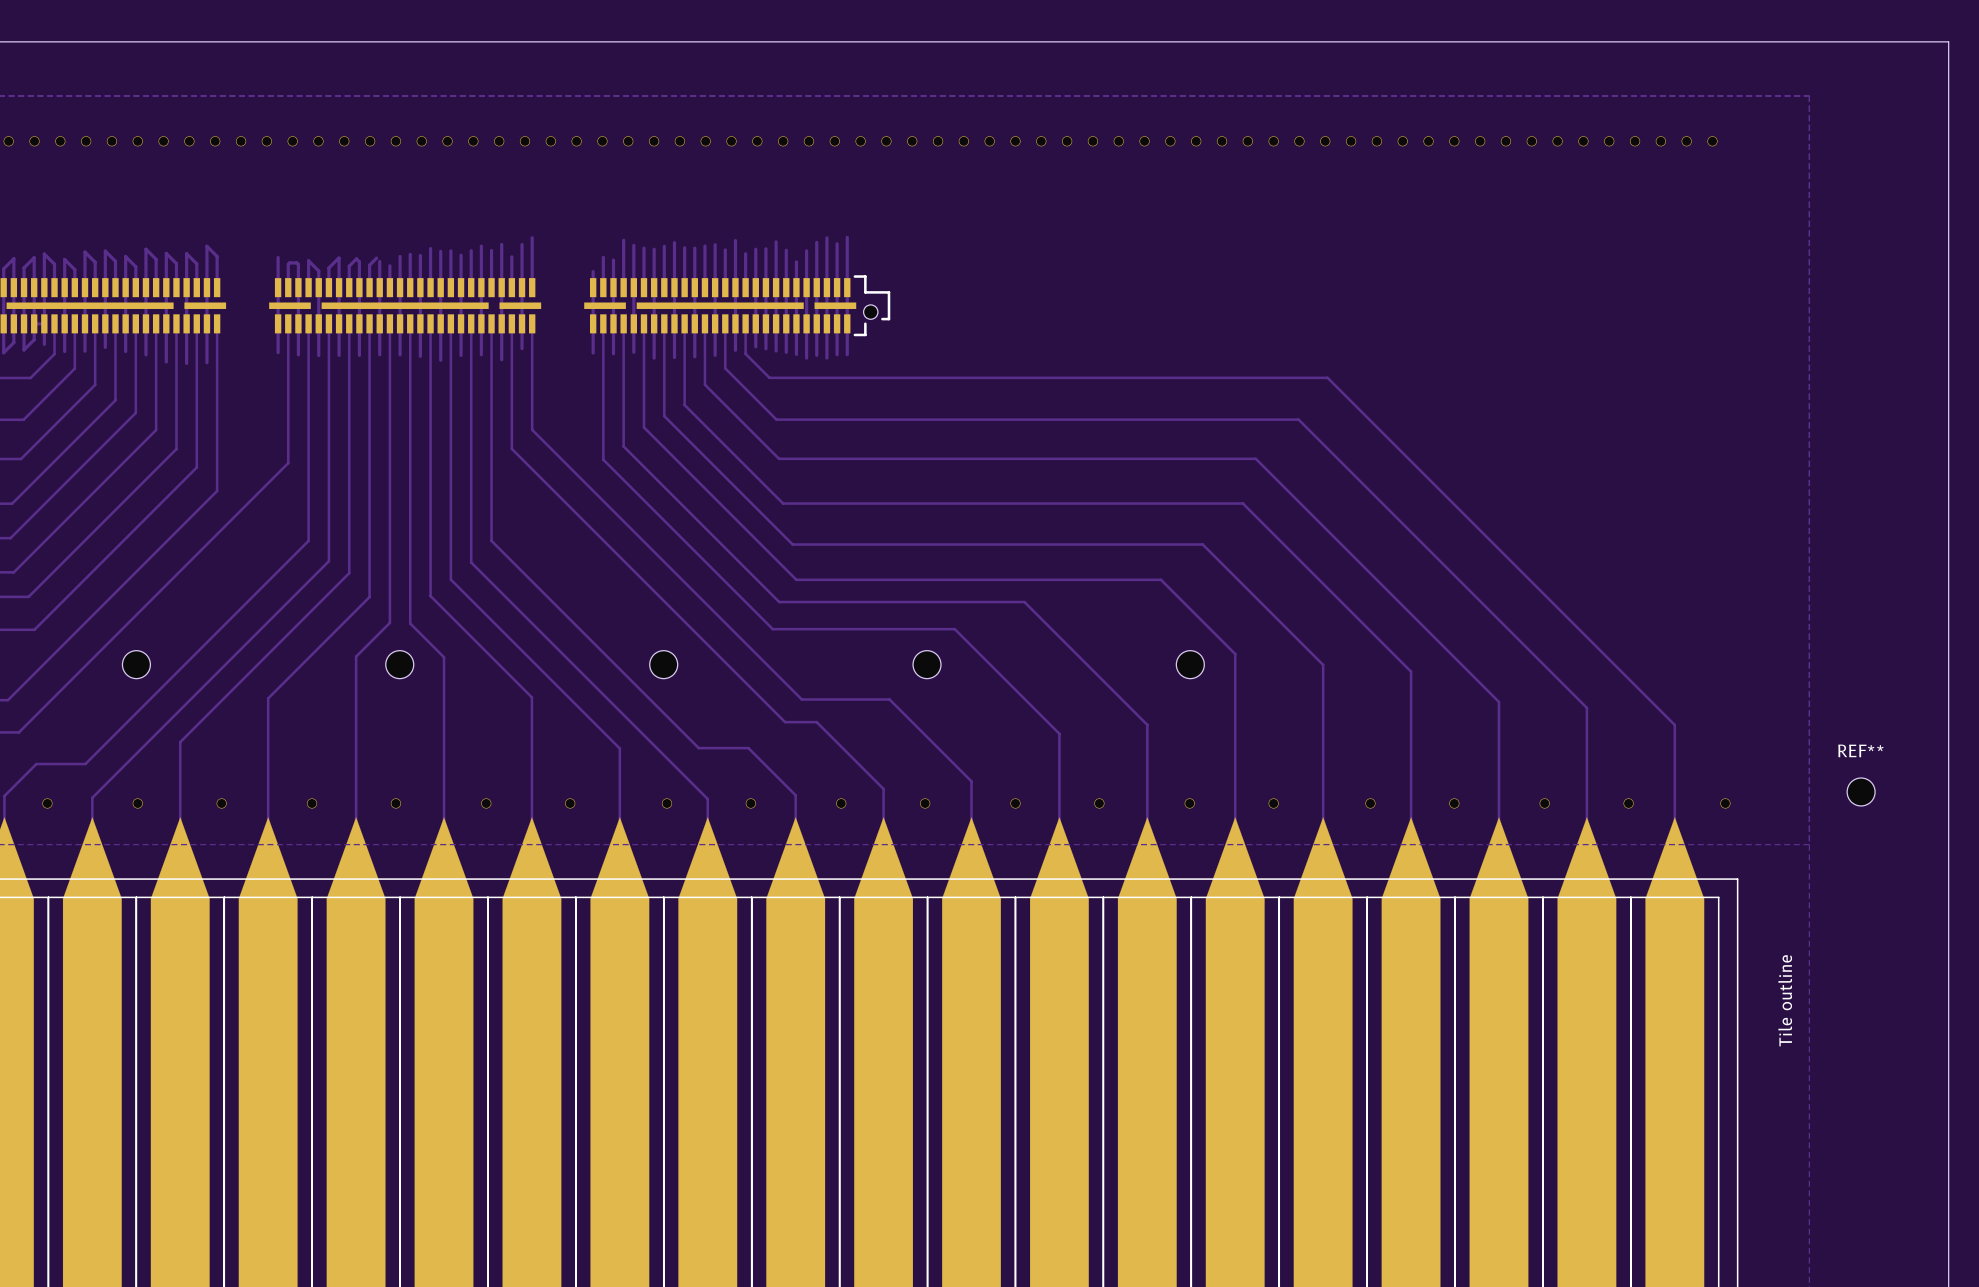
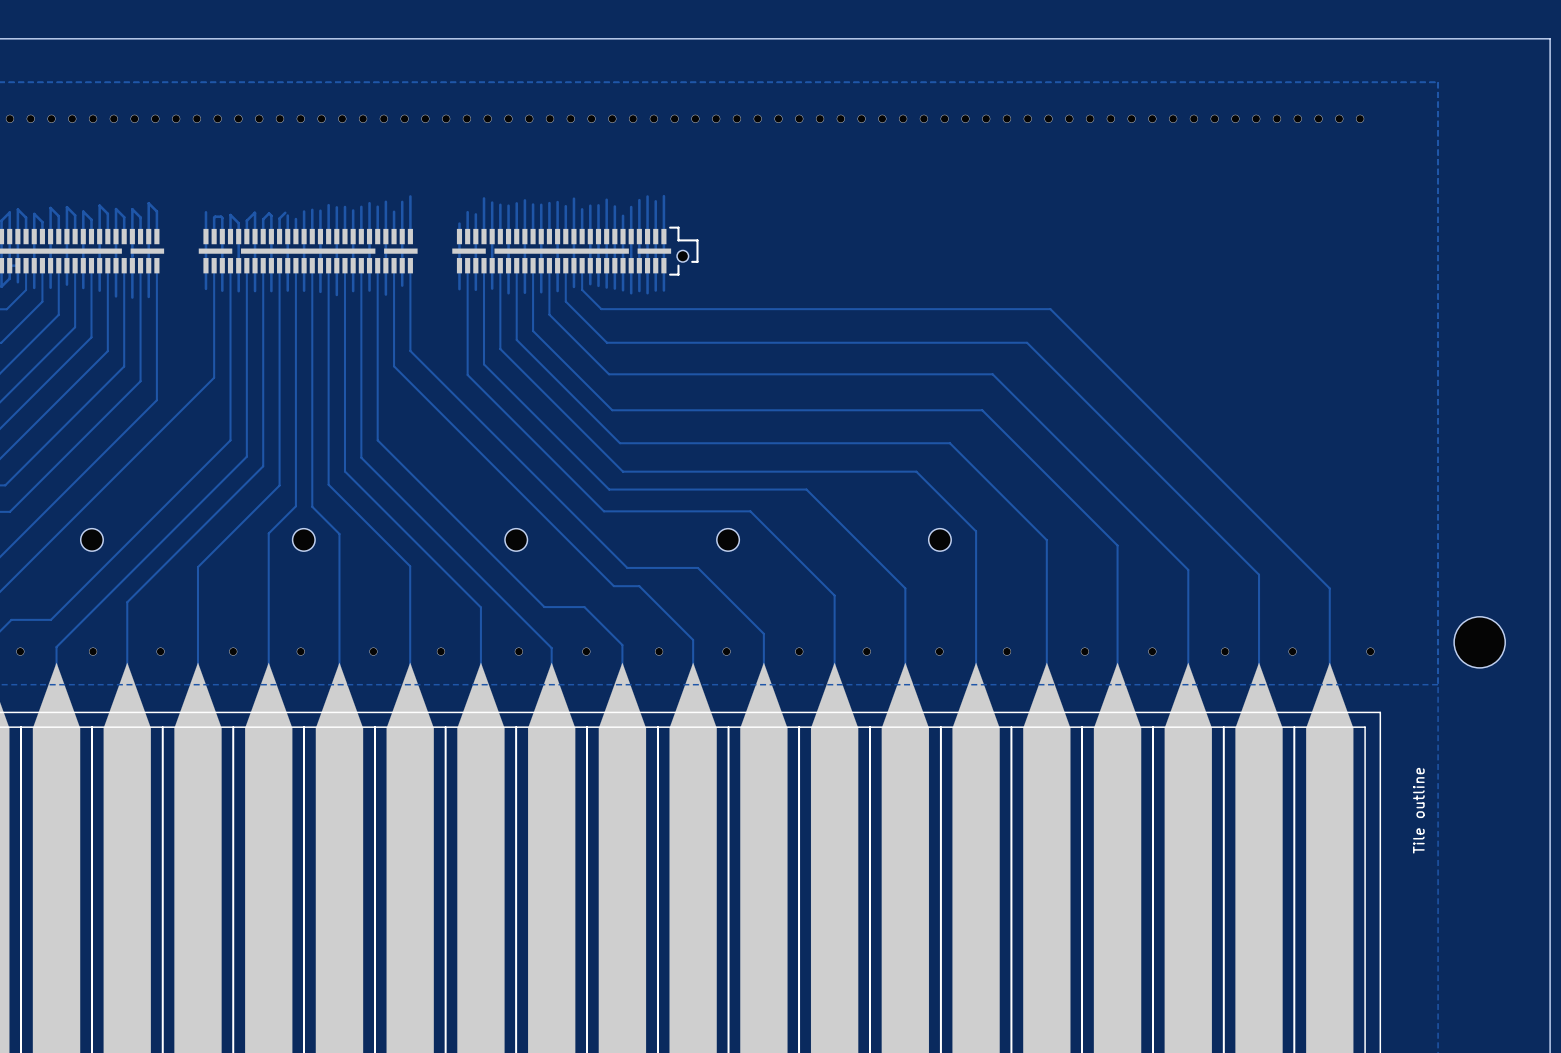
REF**: (1861, 791) -> none
part: none -> (1479, 642)

